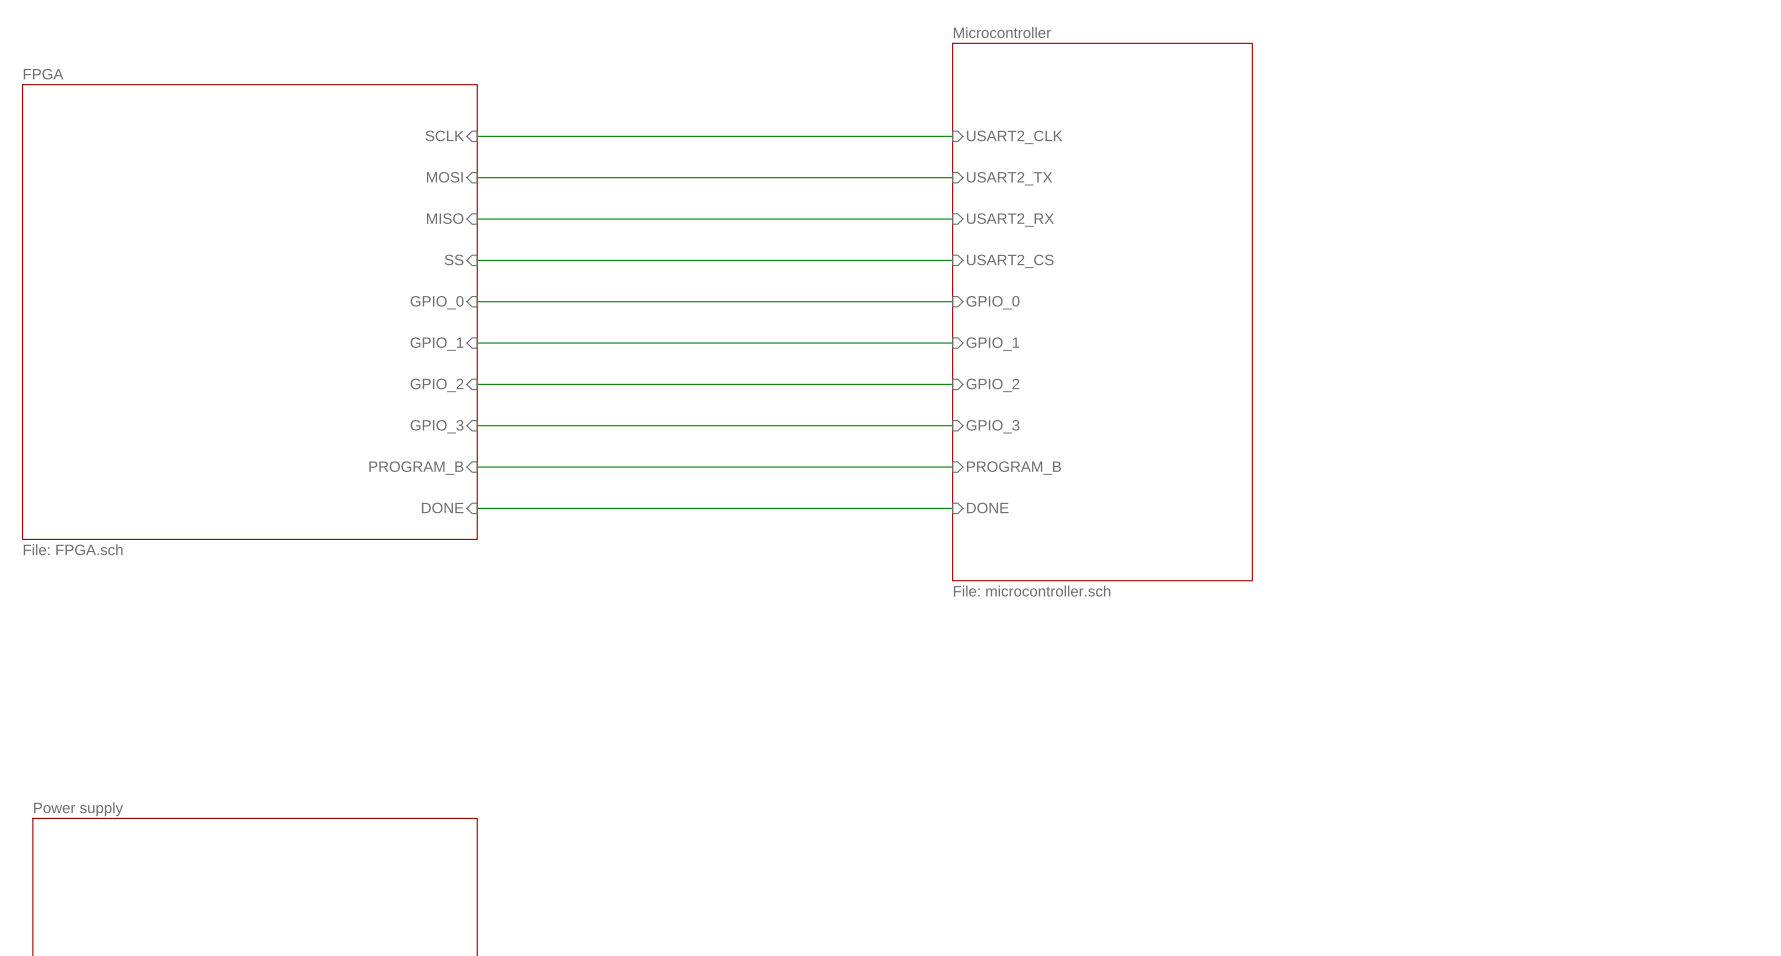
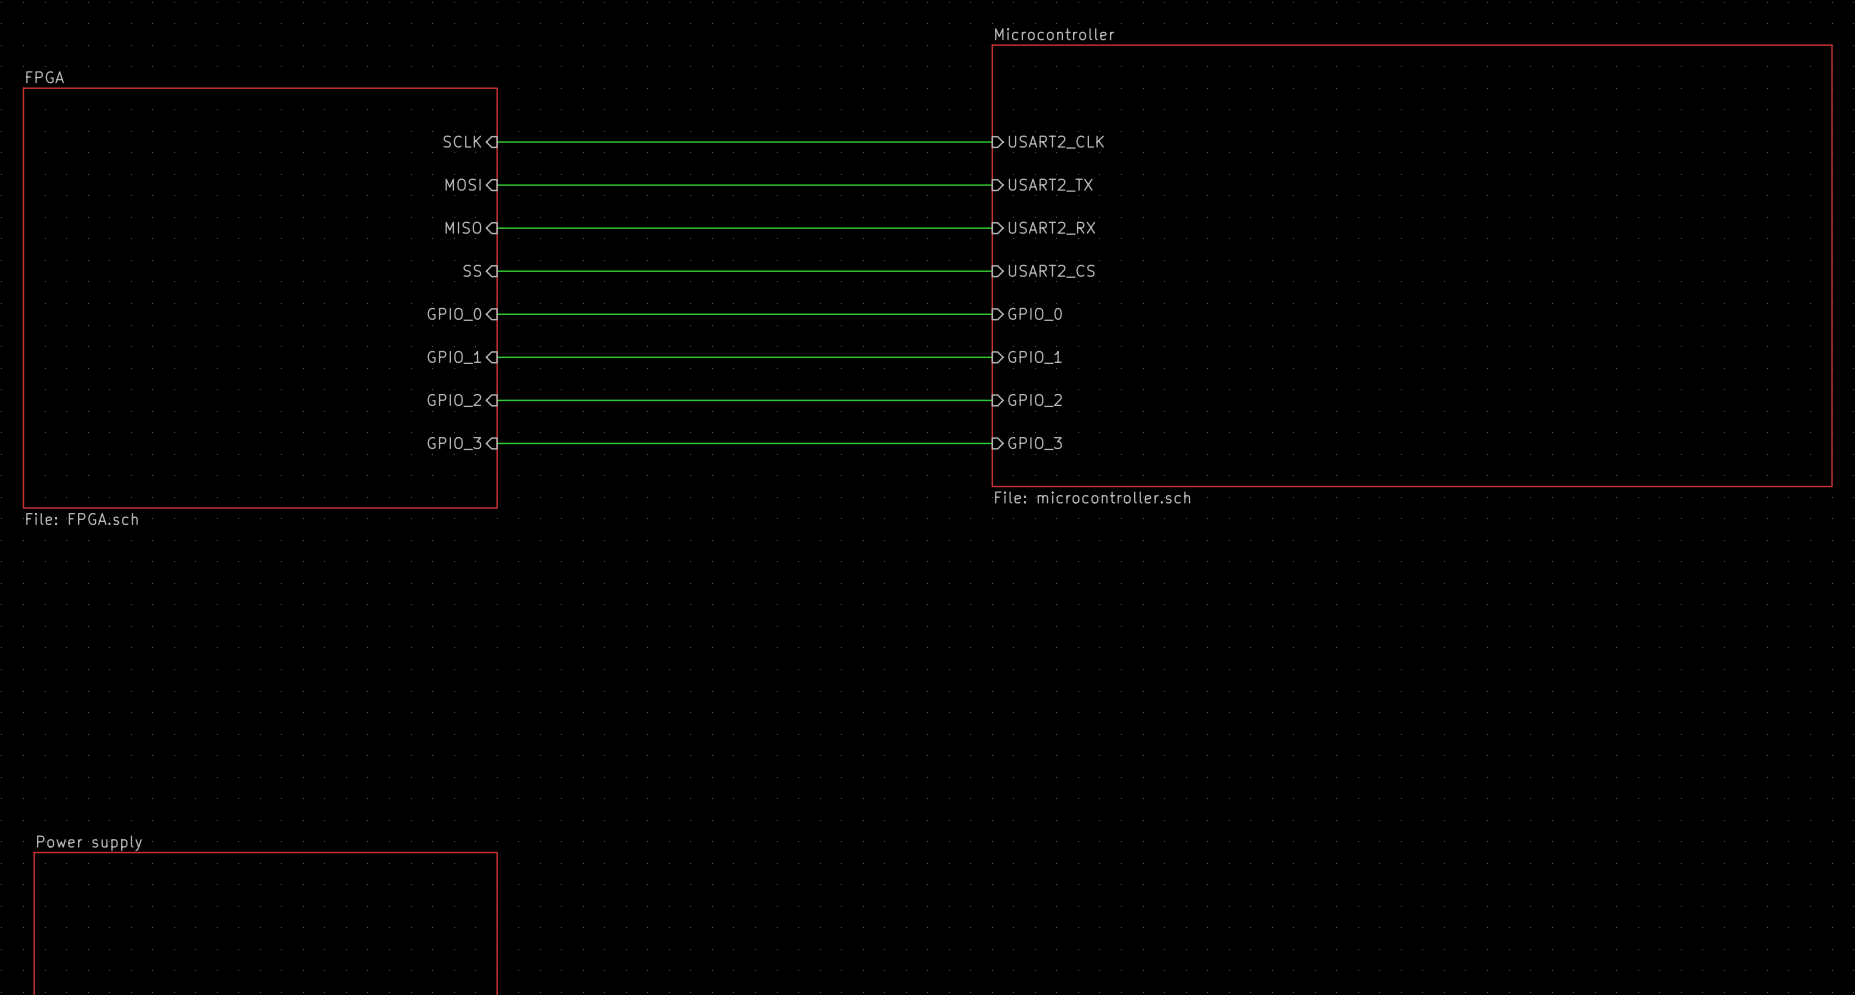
sheet Microcontroller: none -> File: microcontroller.sch (1412, 265)
sheet FPGA: none -> File: FPGA.sch (260, 298)
sheet FPGA: File: FPGA.sch (249, 312) -> none
sheet Microcontroller: File: microcontroller.sch (1102, 312) -> none
wire: (477, 467) (952, 467) -> none
sheet pin: PROGRAM_B (416, 468) -> none
sheet pin: PROGRAM_B (1013, 468) -> none
sheet pin: DONE (442, 508) -> none
wire: (477, 508) (952, 508) -> none
sheet pin: DONE (987, 508) -> none

